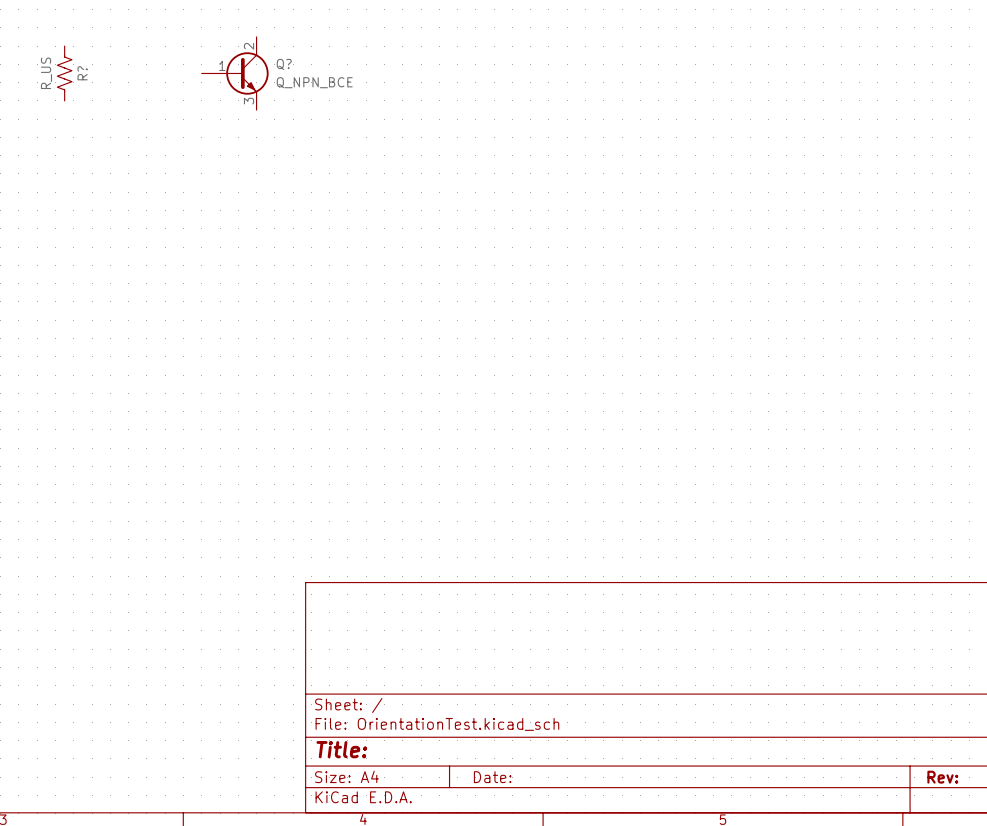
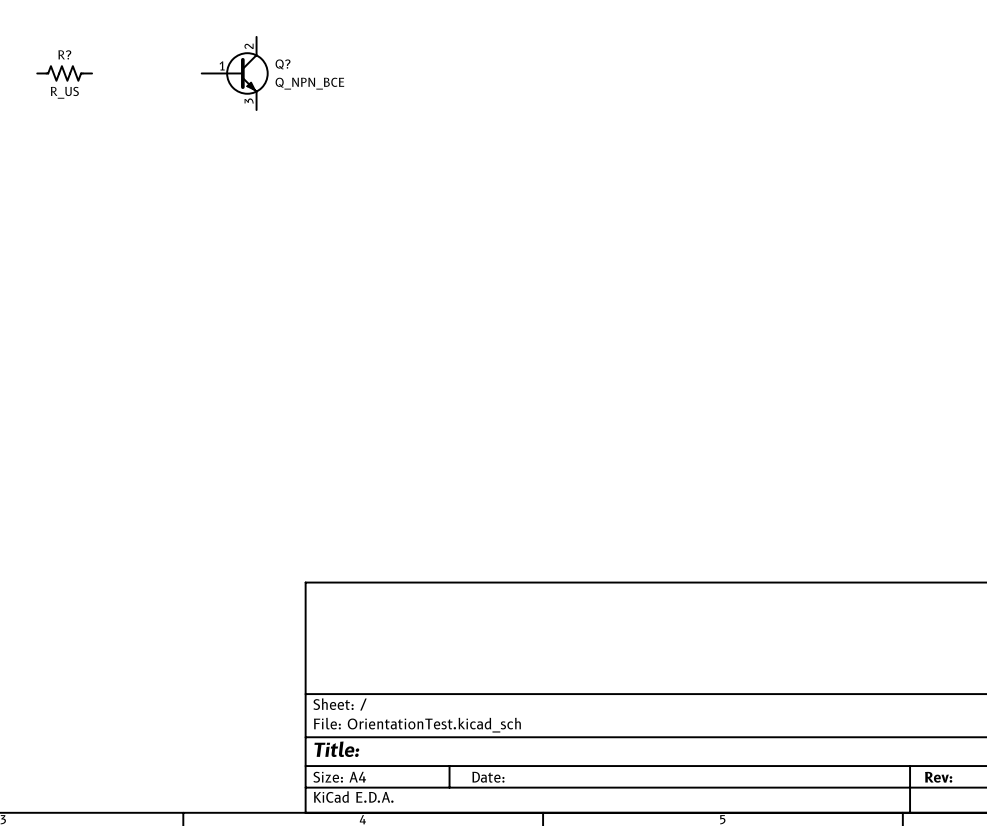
R? value position: R_US (46, 73) -> R_US (64, 92)
R? rotation: 0° (64, 73) -> 90° clockwise (64, 73)
R? name position: R? (82, 73) -> R? (64, 54)

